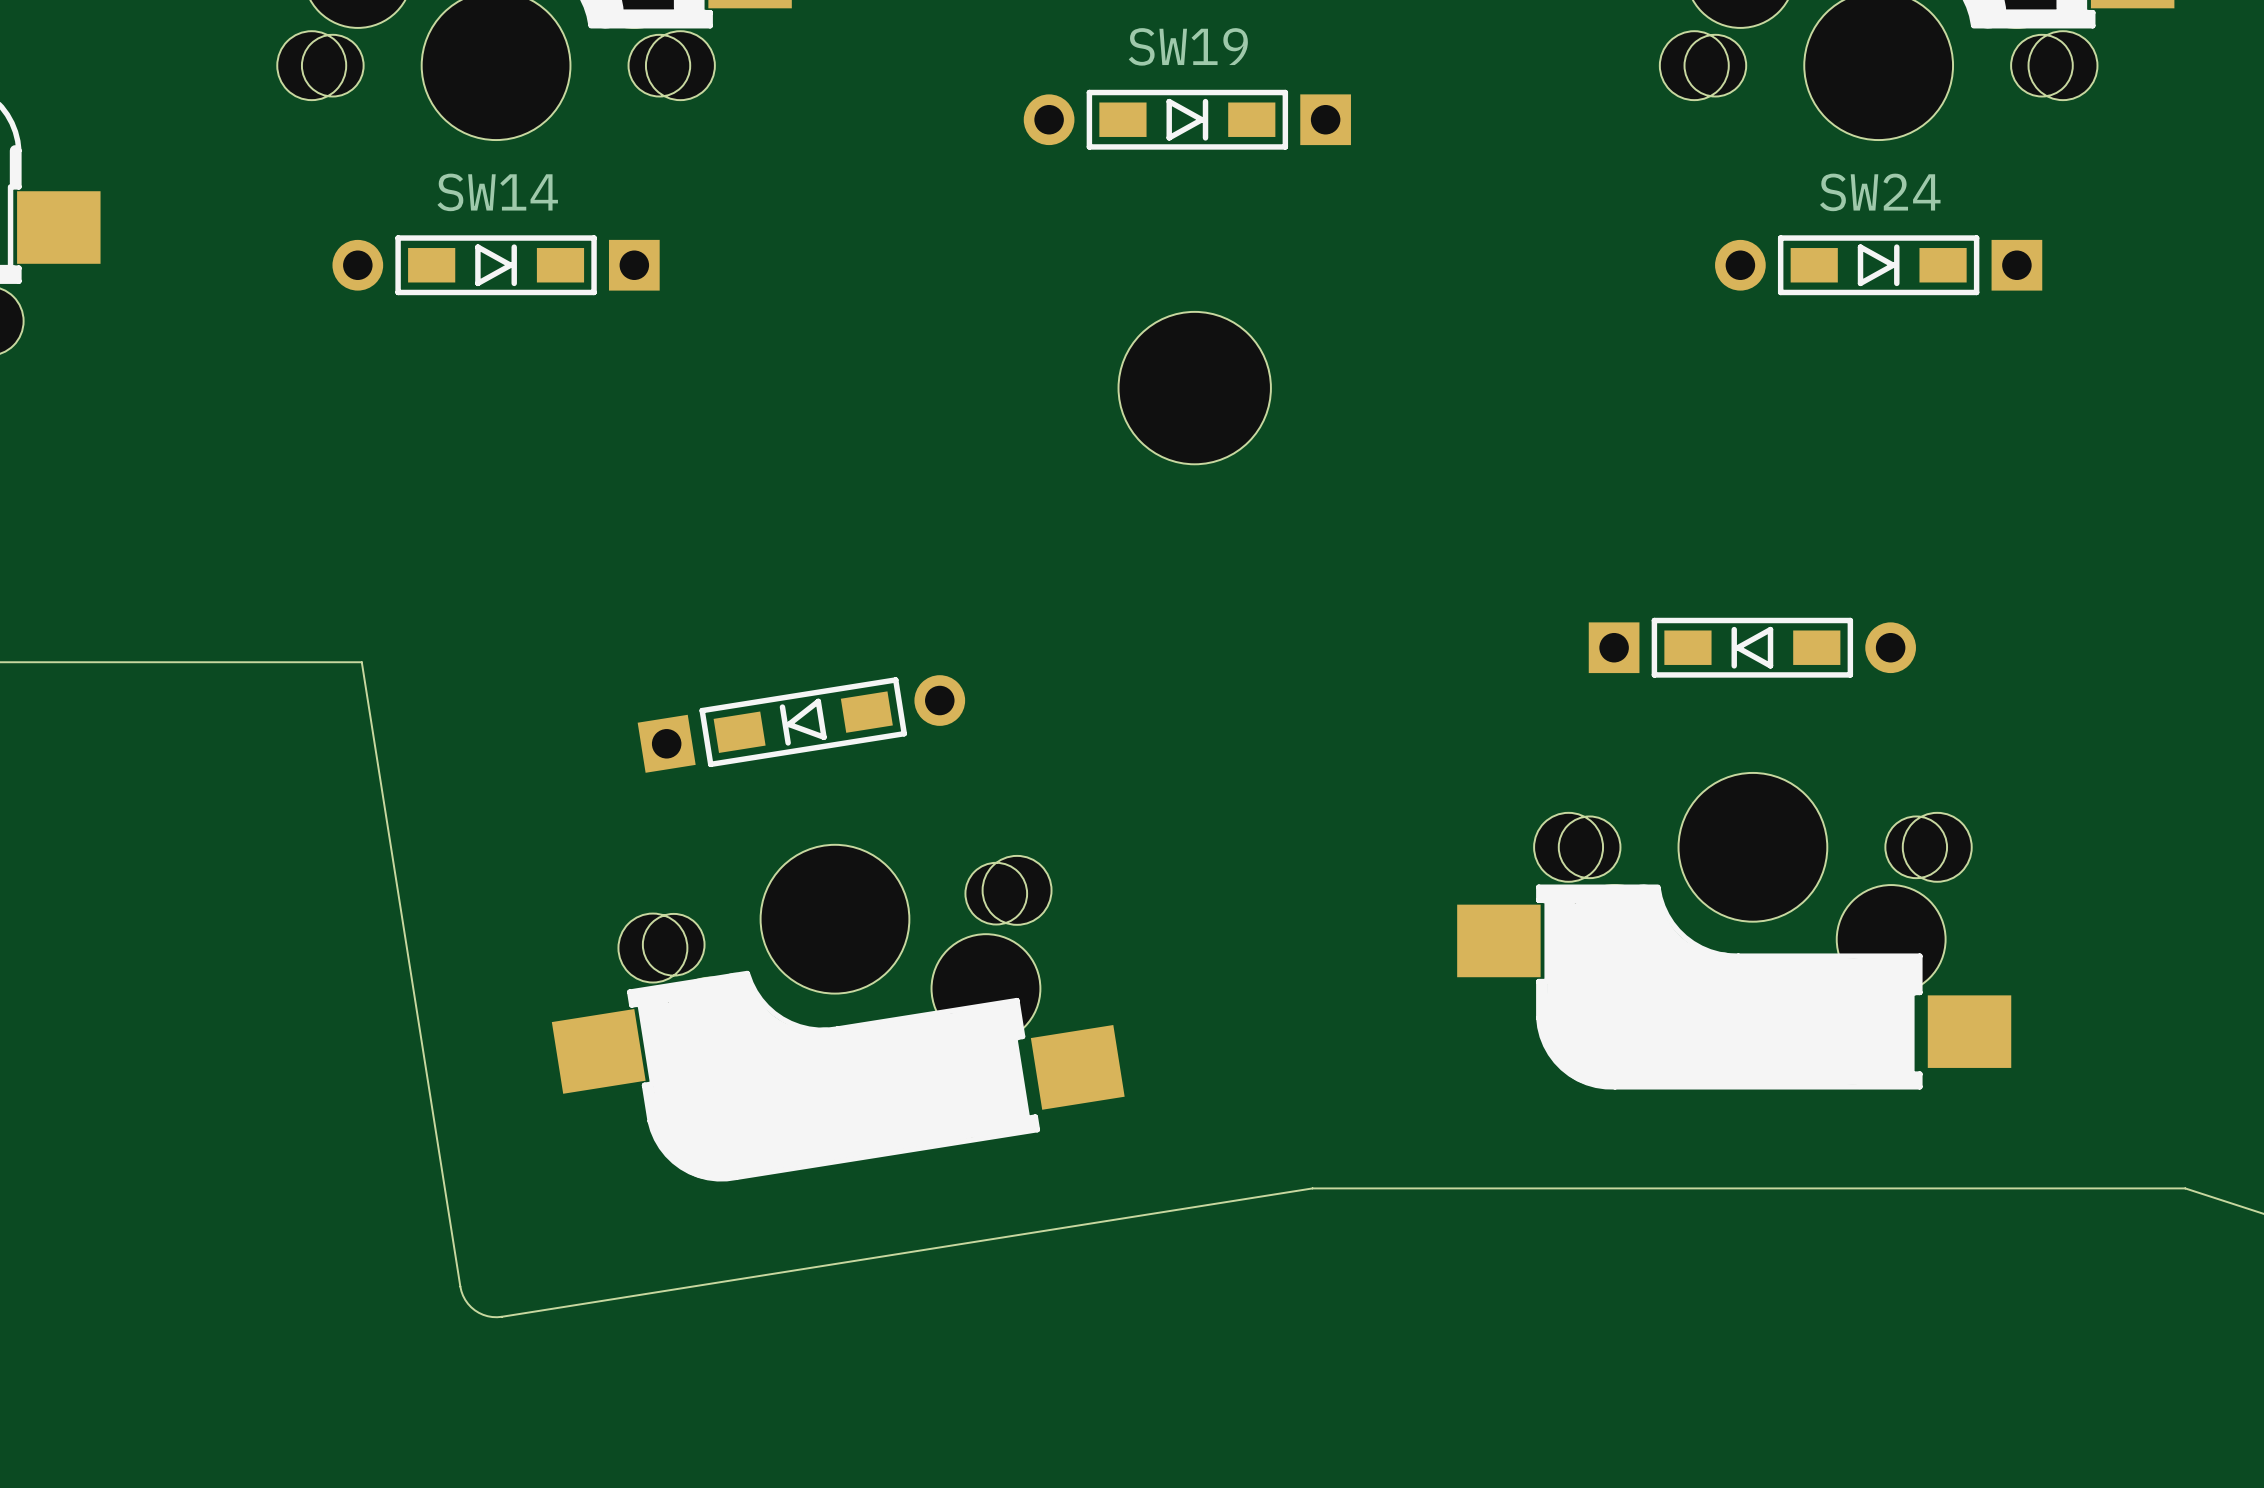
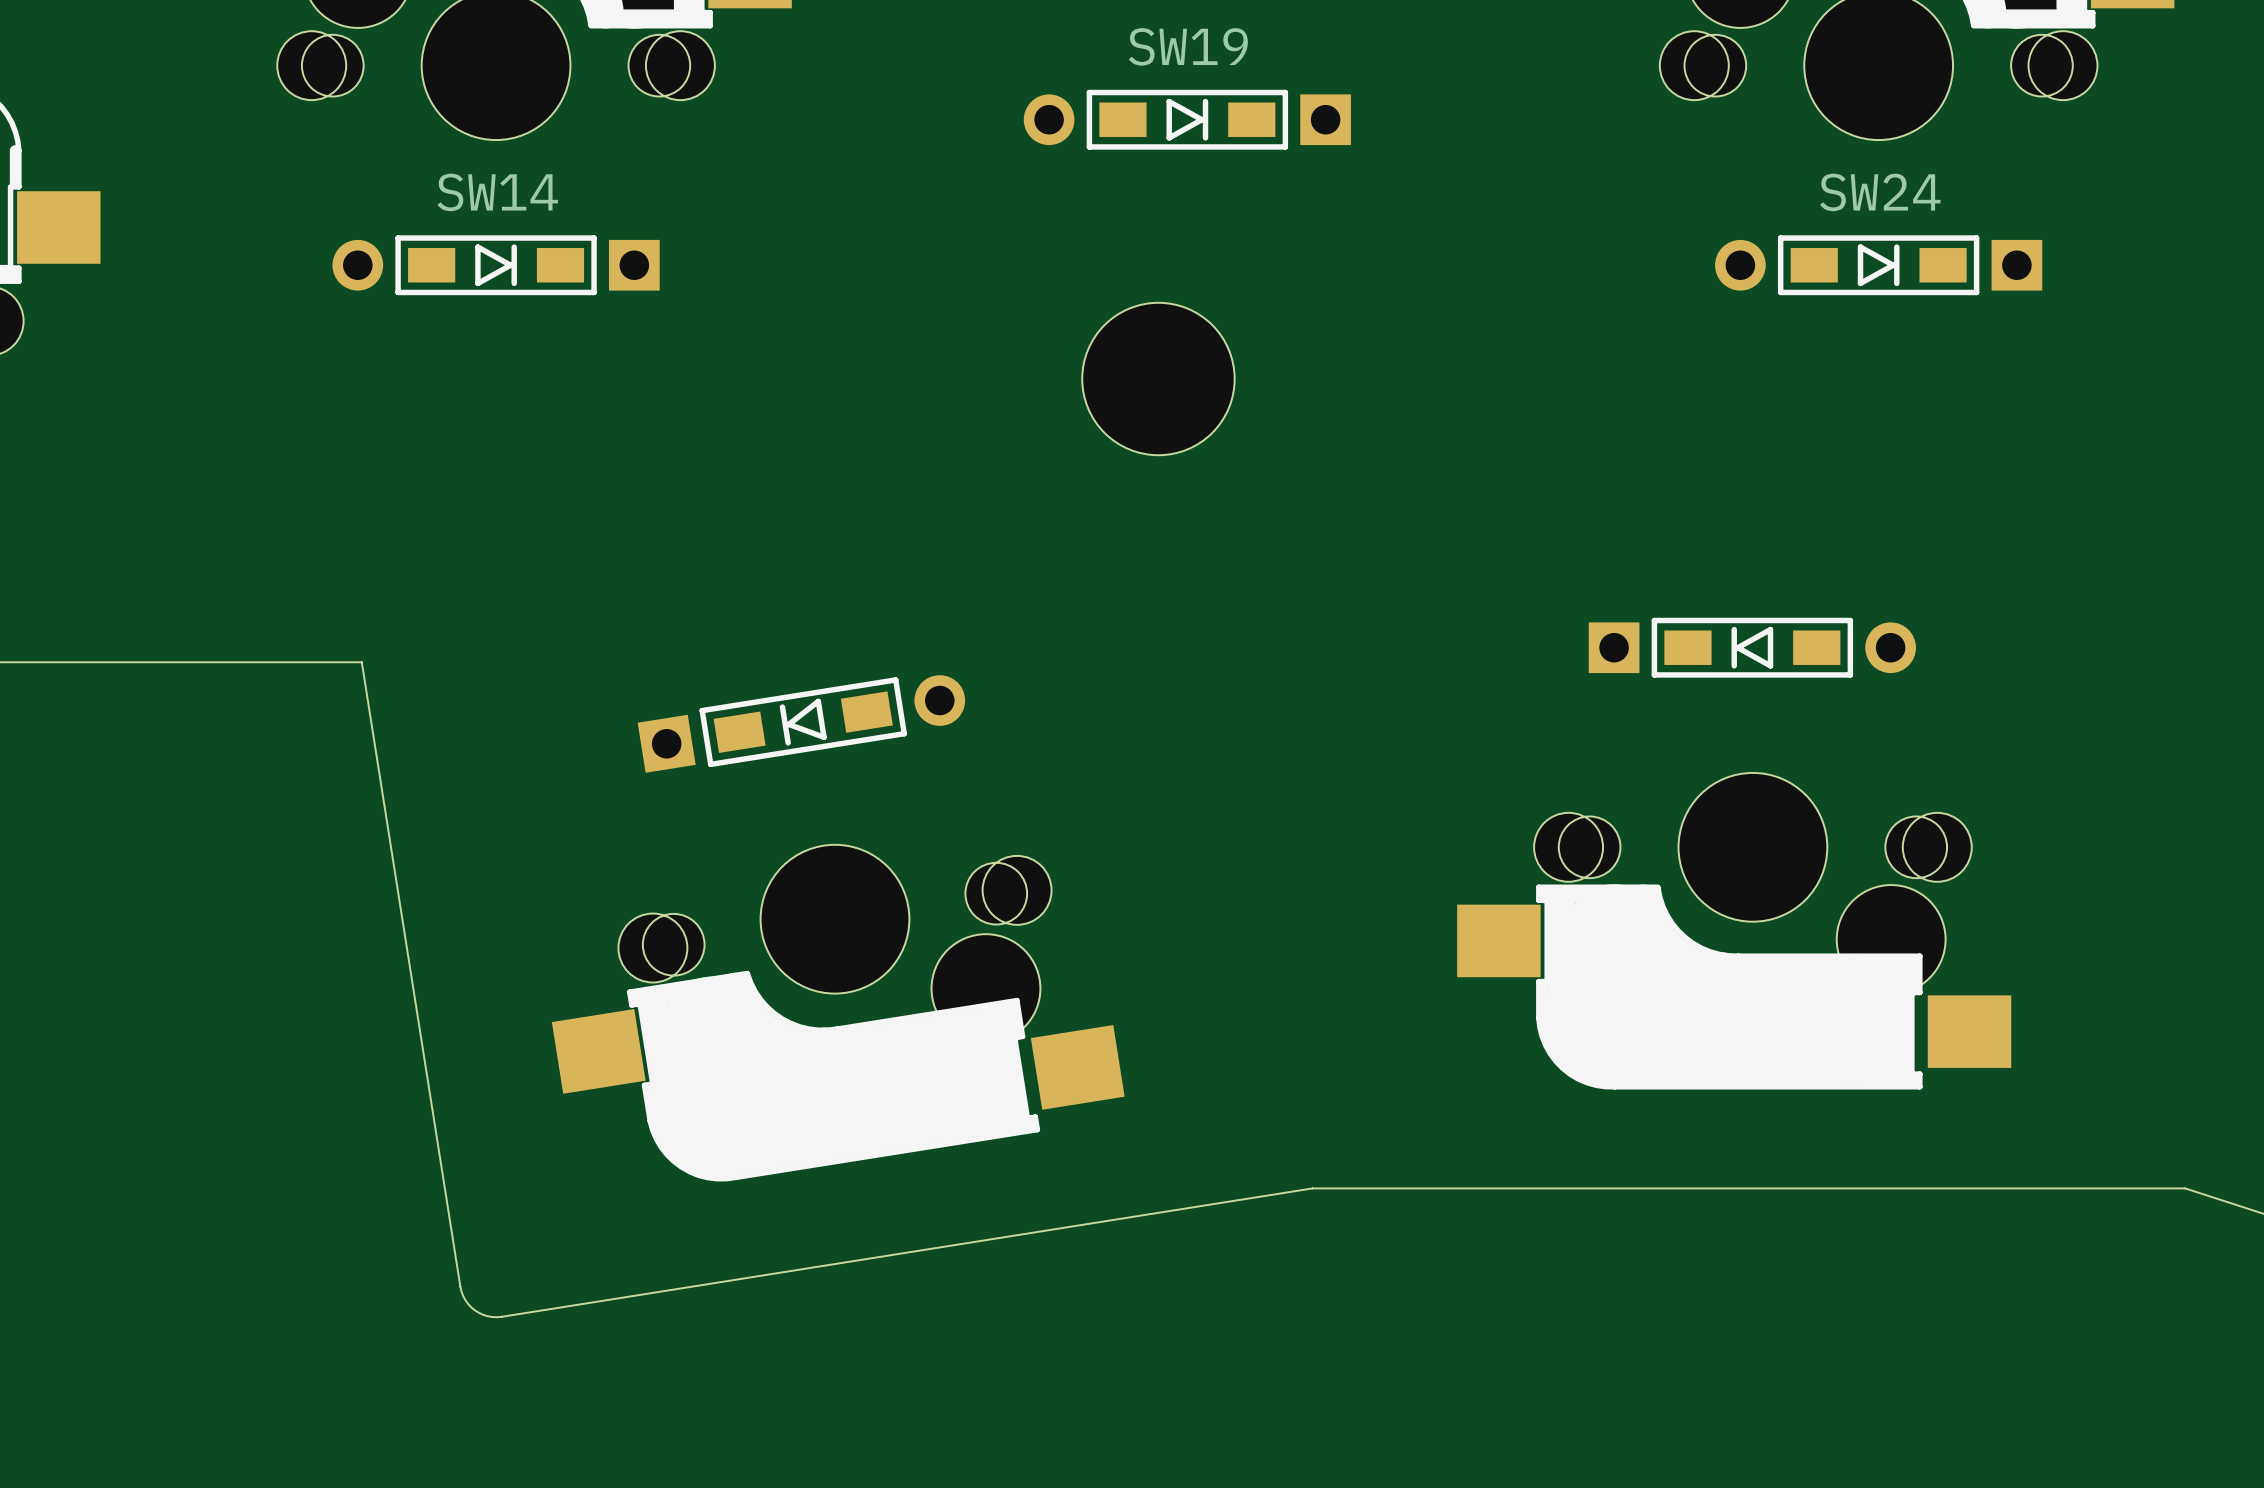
part position: (1194, 388) -> (1158, 379)

